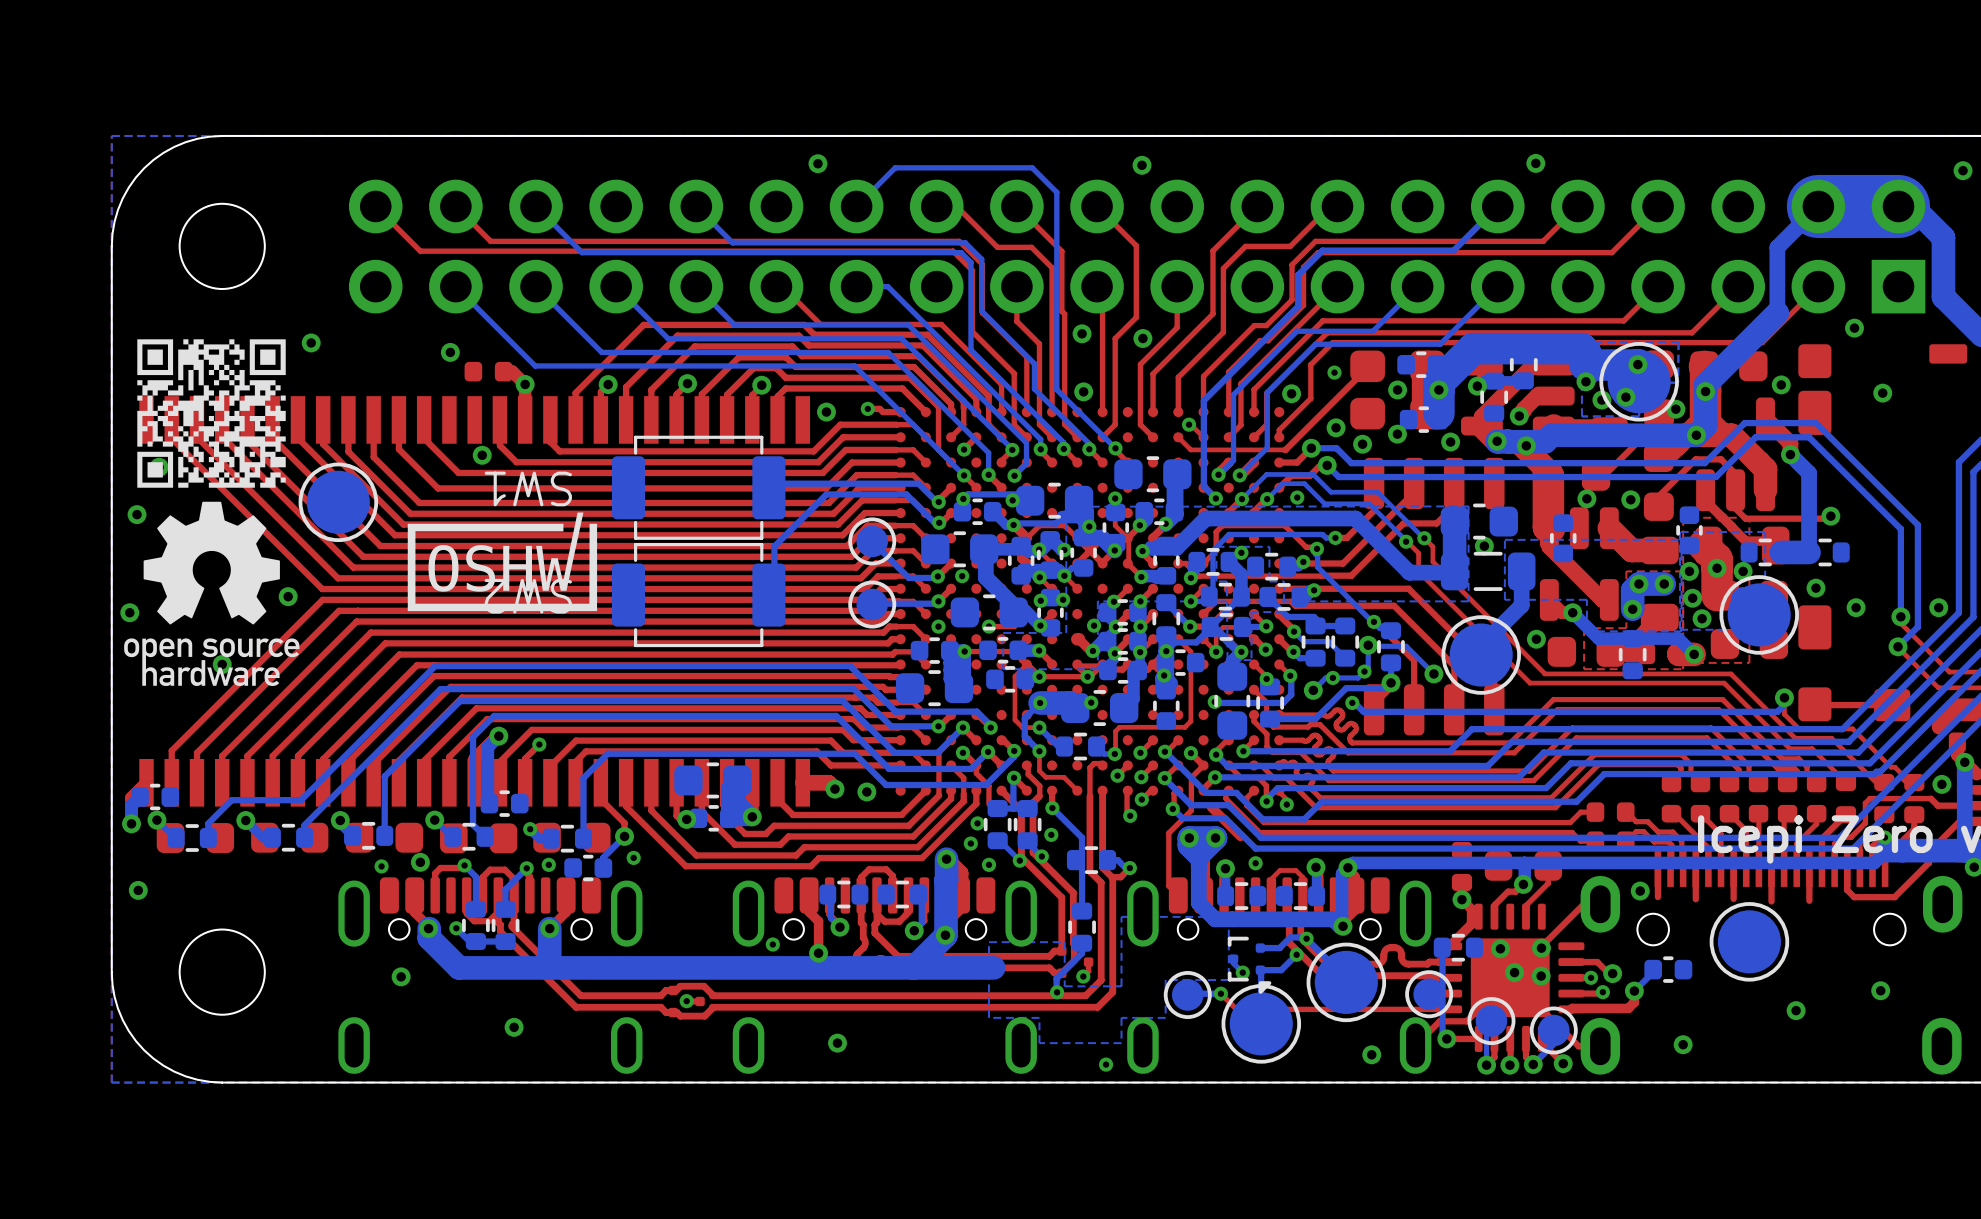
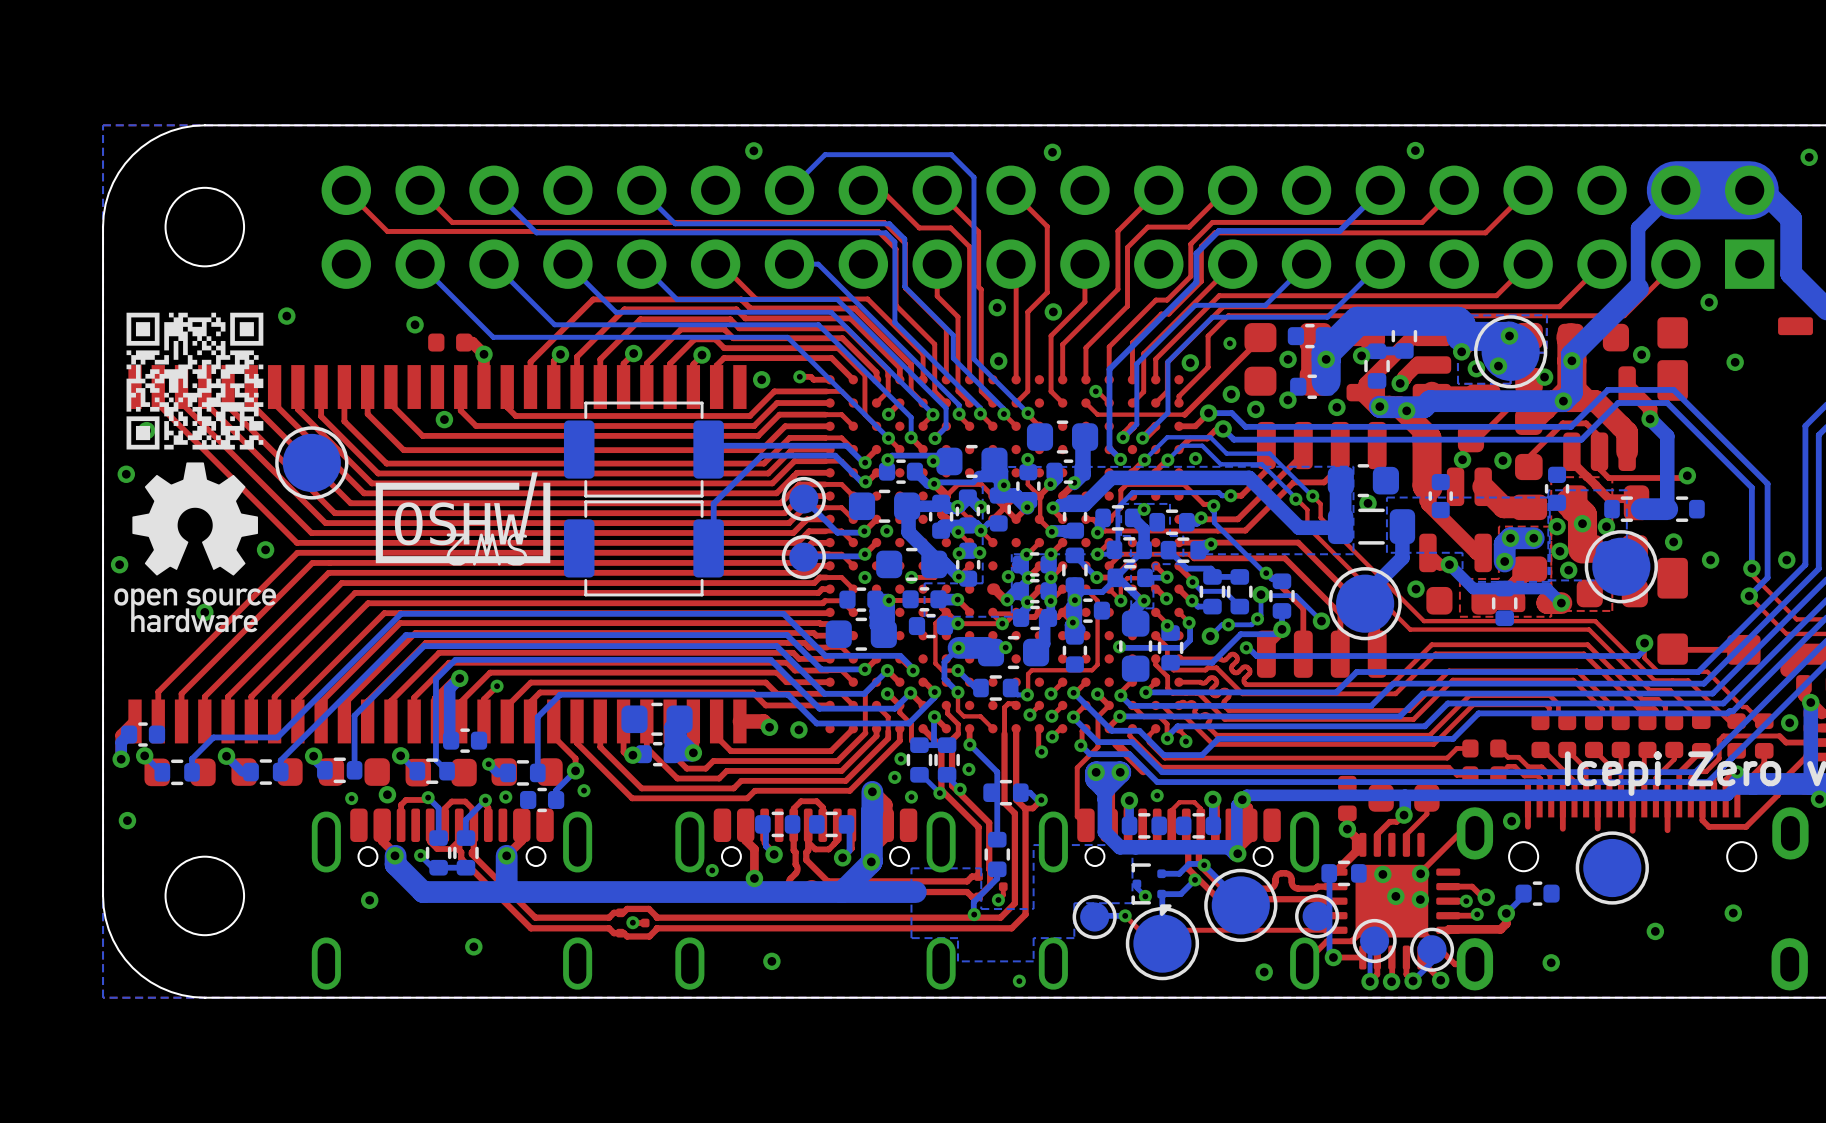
SW1 name: SW1 (528, 488) -> none

